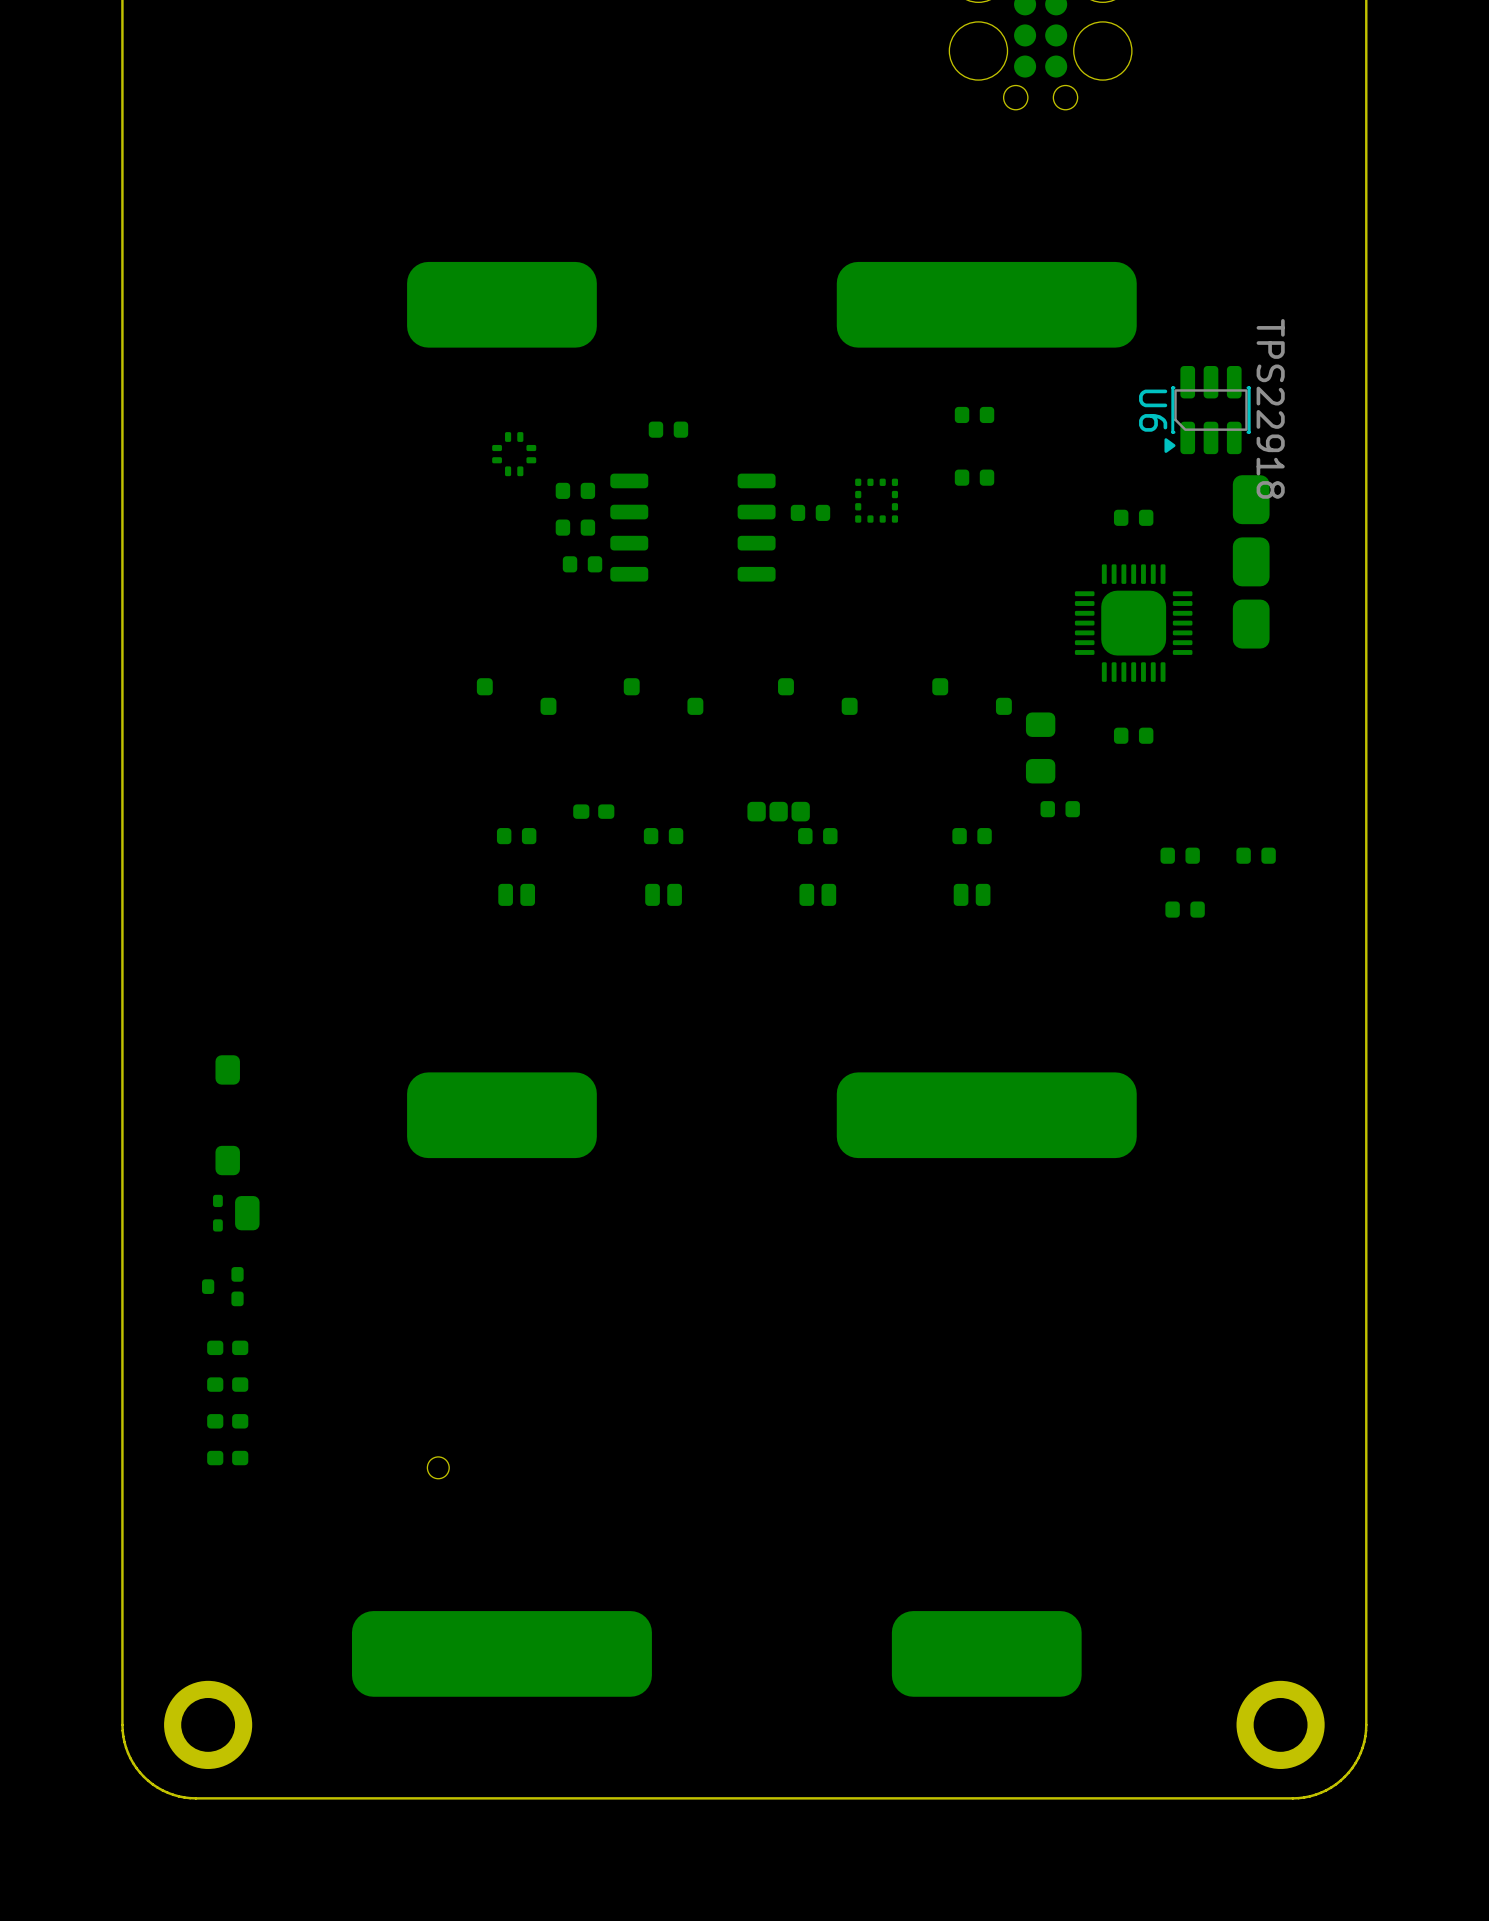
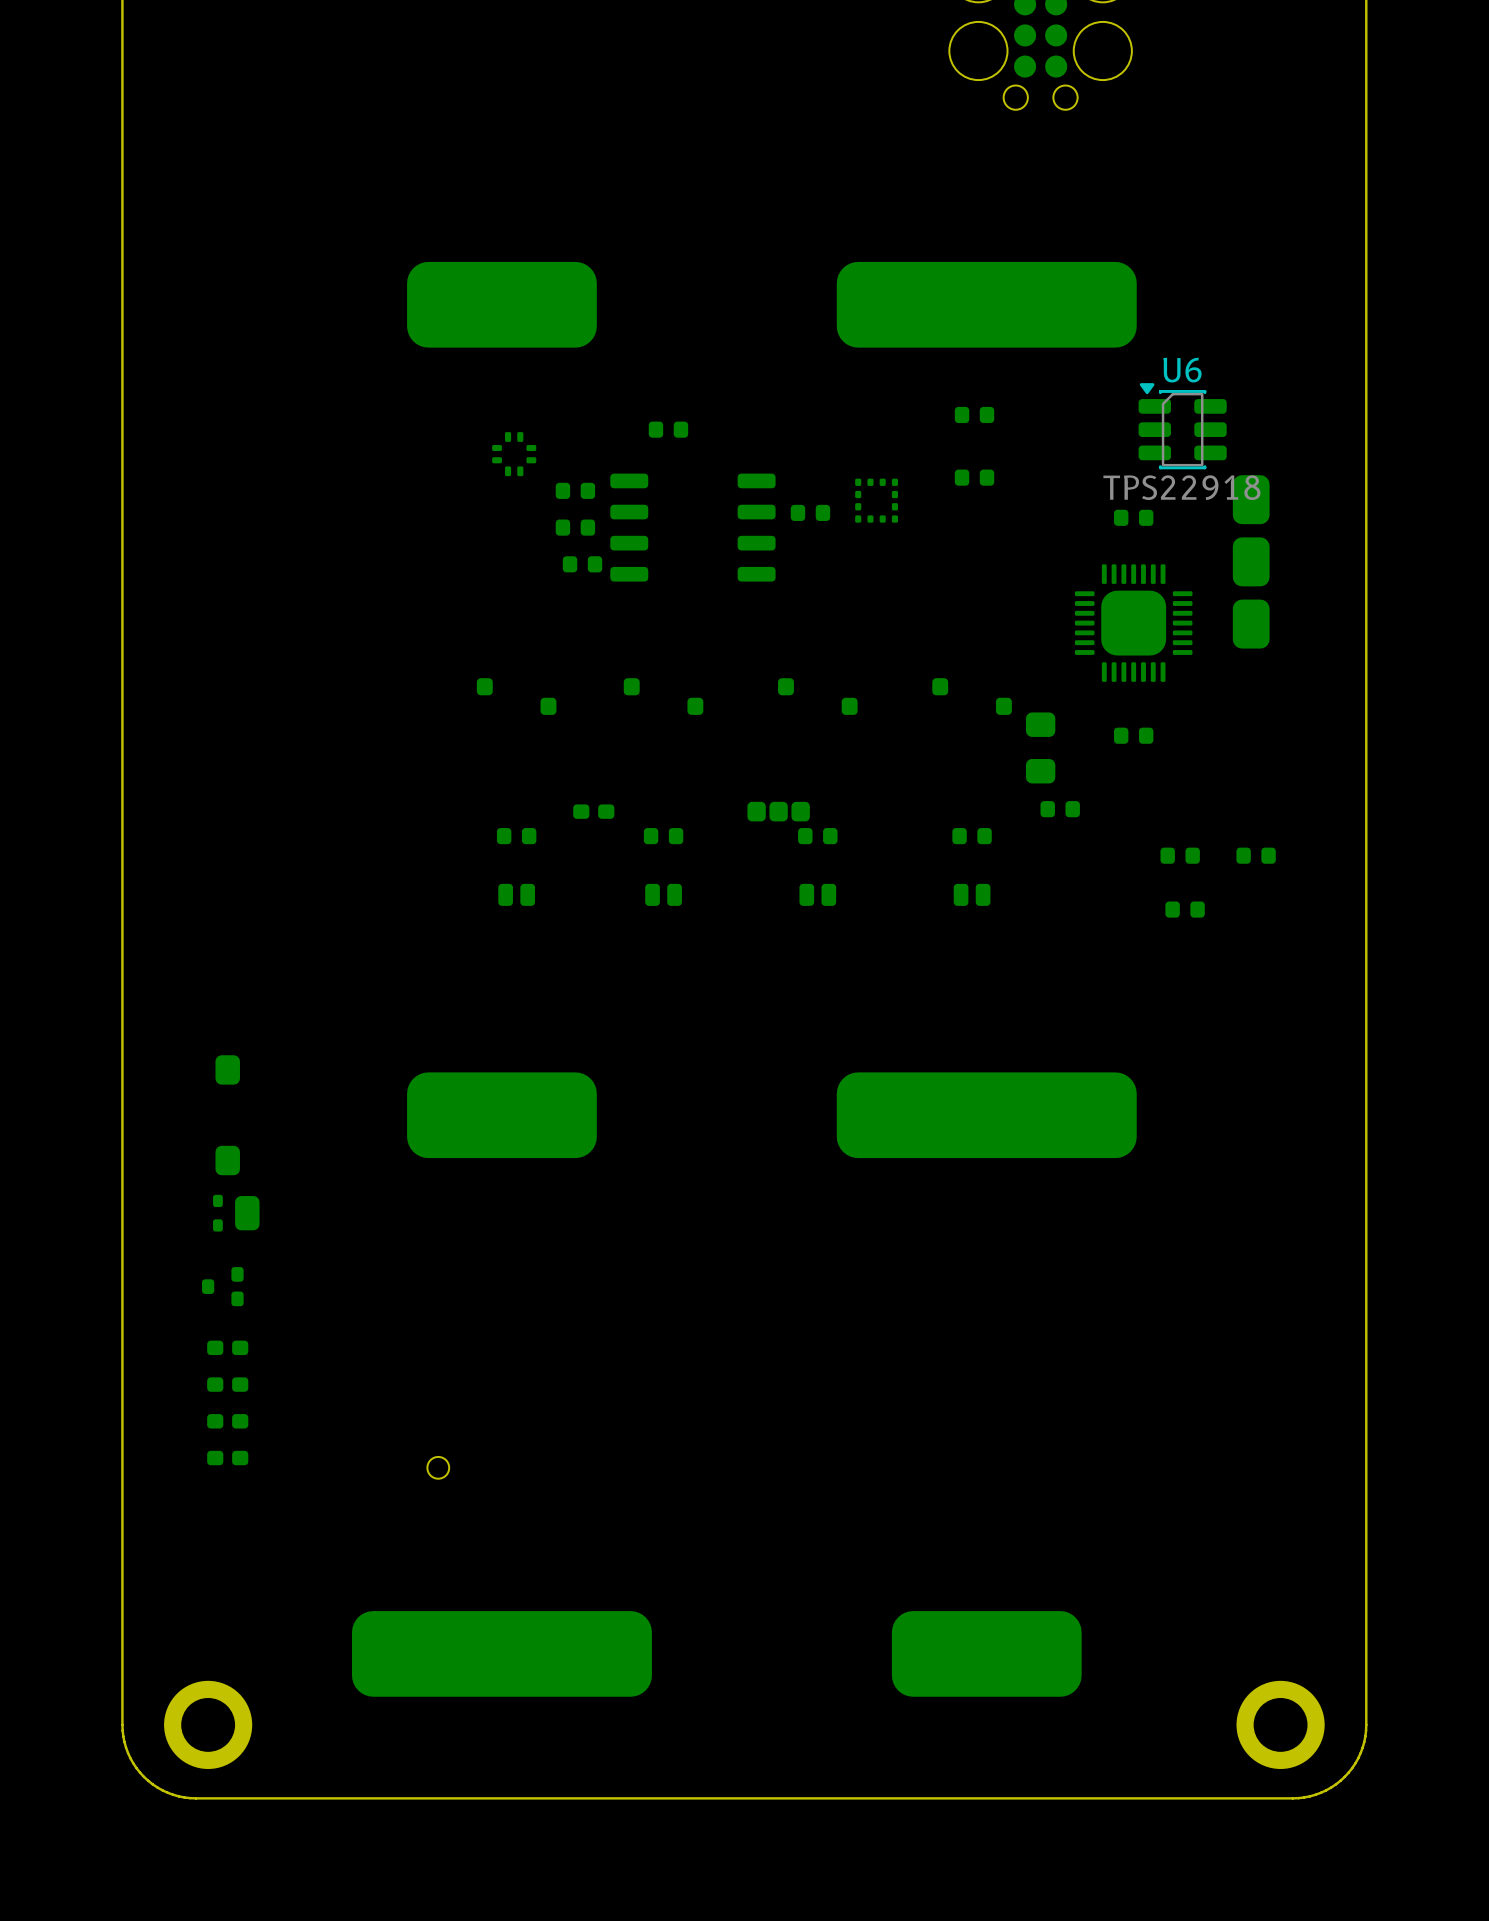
U6 rotation: 0° (1207, 410) -> 90° clockwise (1182, 426)

